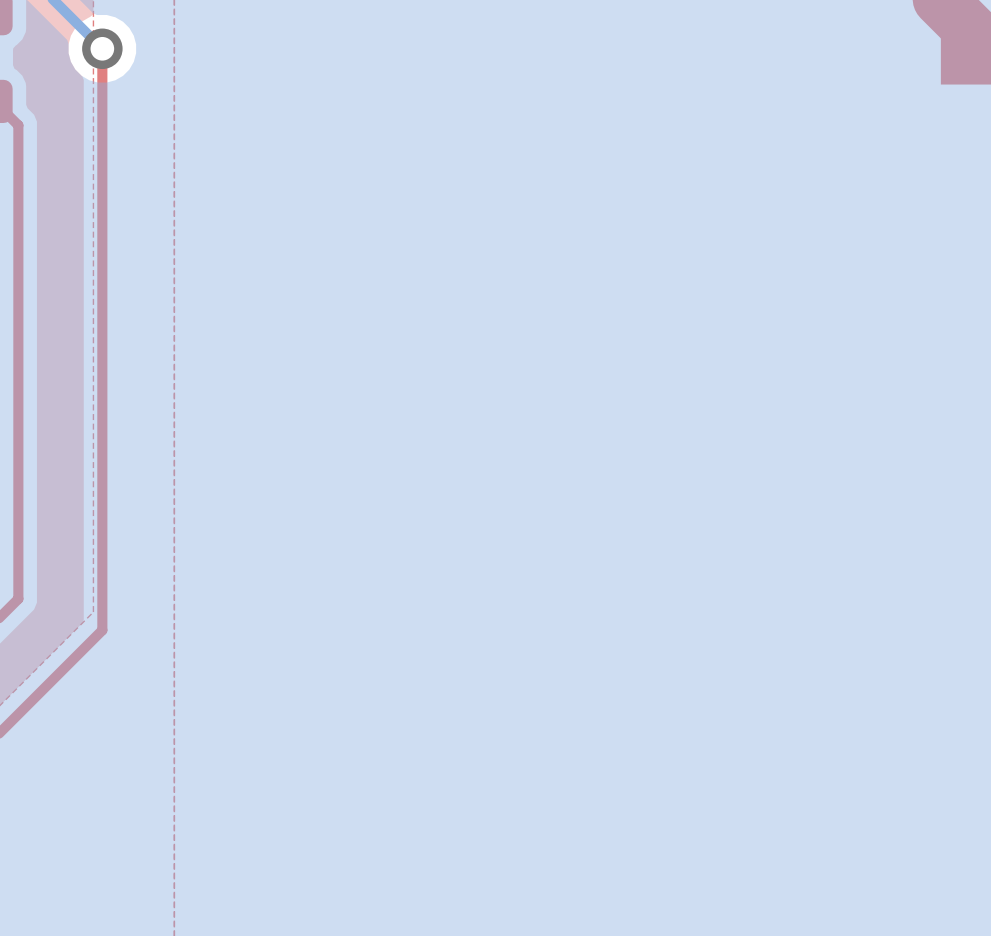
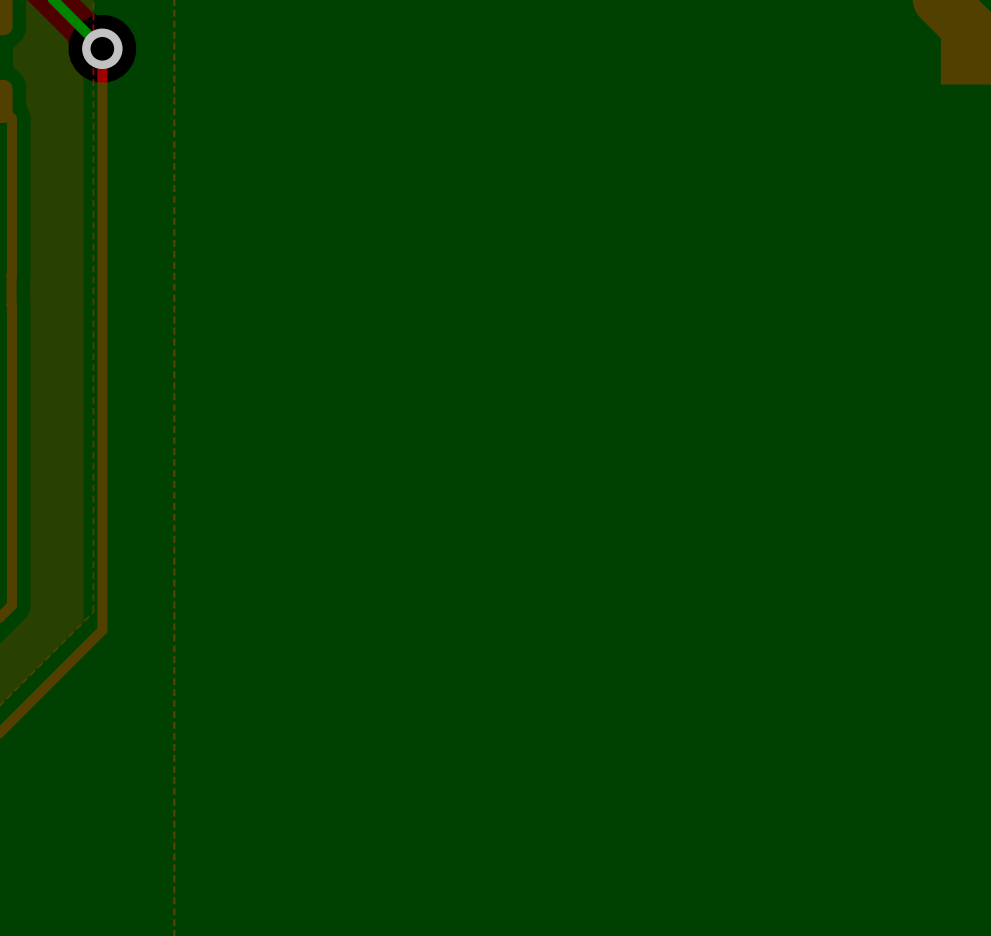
top track: (11, 118) (18, 125) (18, 598) (11, 605) -> (11, 305) (11, 605)
top track: none -> (11, 118) (11, 275)
top track: none -> (11, 275) (11, 304)

